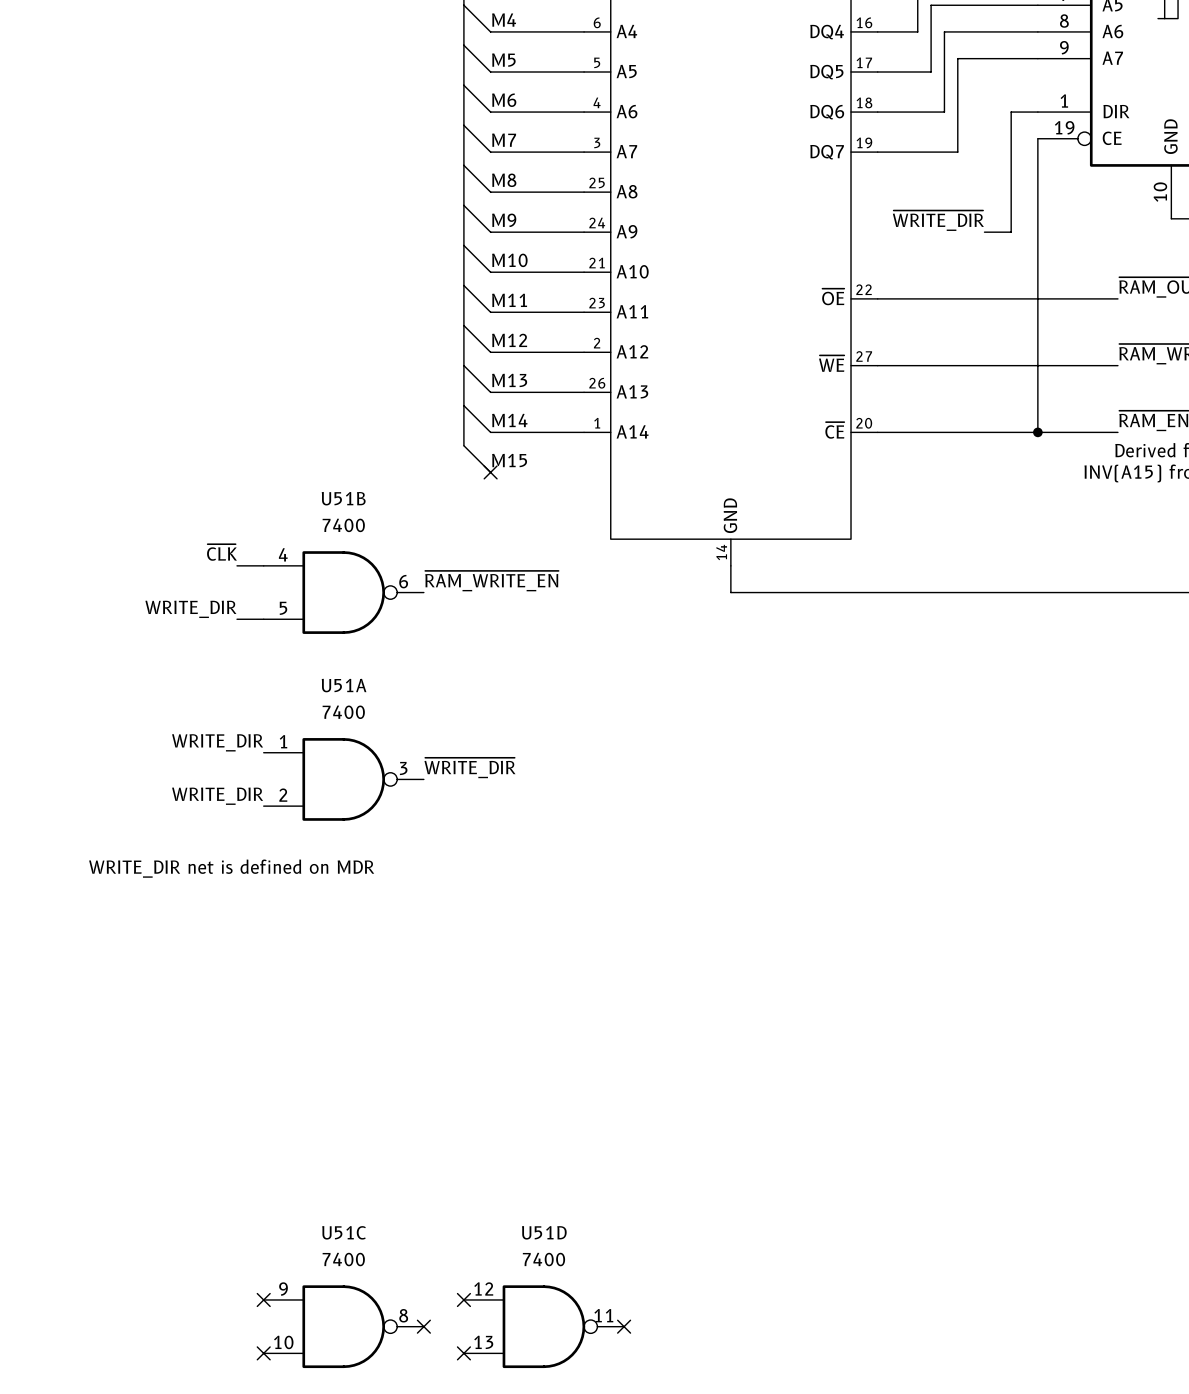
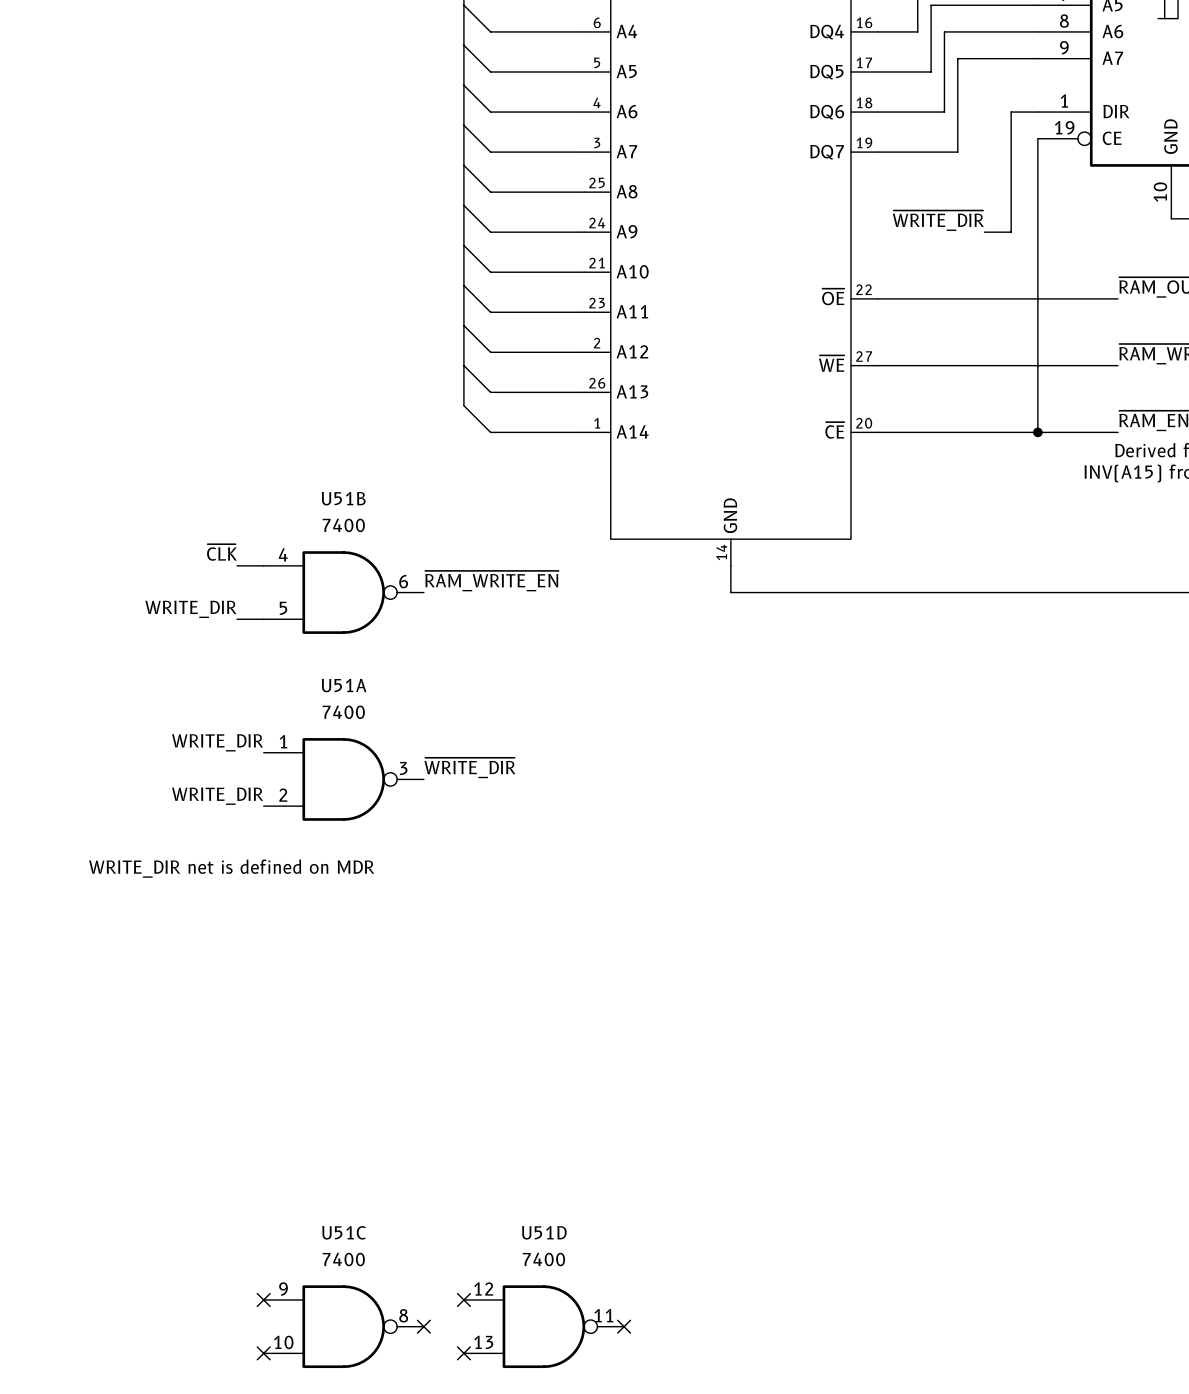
label: M4 (504, 20) -> none
label: M5 (503, 60) -> none
label: M6 (504, 100) -> none
label: M7 (504, 140) -> none
label: M8 (504, 180) -> none
label: M9 (504, 220) -> none
label: M10 (509, 260) -> none
label: M11 (509, 300) -> none
label: M12 (509, 340) -> none
label: M13 (509, 380) -> none
bus: (463, 405) (463, 445) -> none
label: M14 (509, 420) -> none
wire: (463, 445) (490, 472) -> none
label: M15 (509, 460) -> none
no-connect mark: (490, 472) -> none

